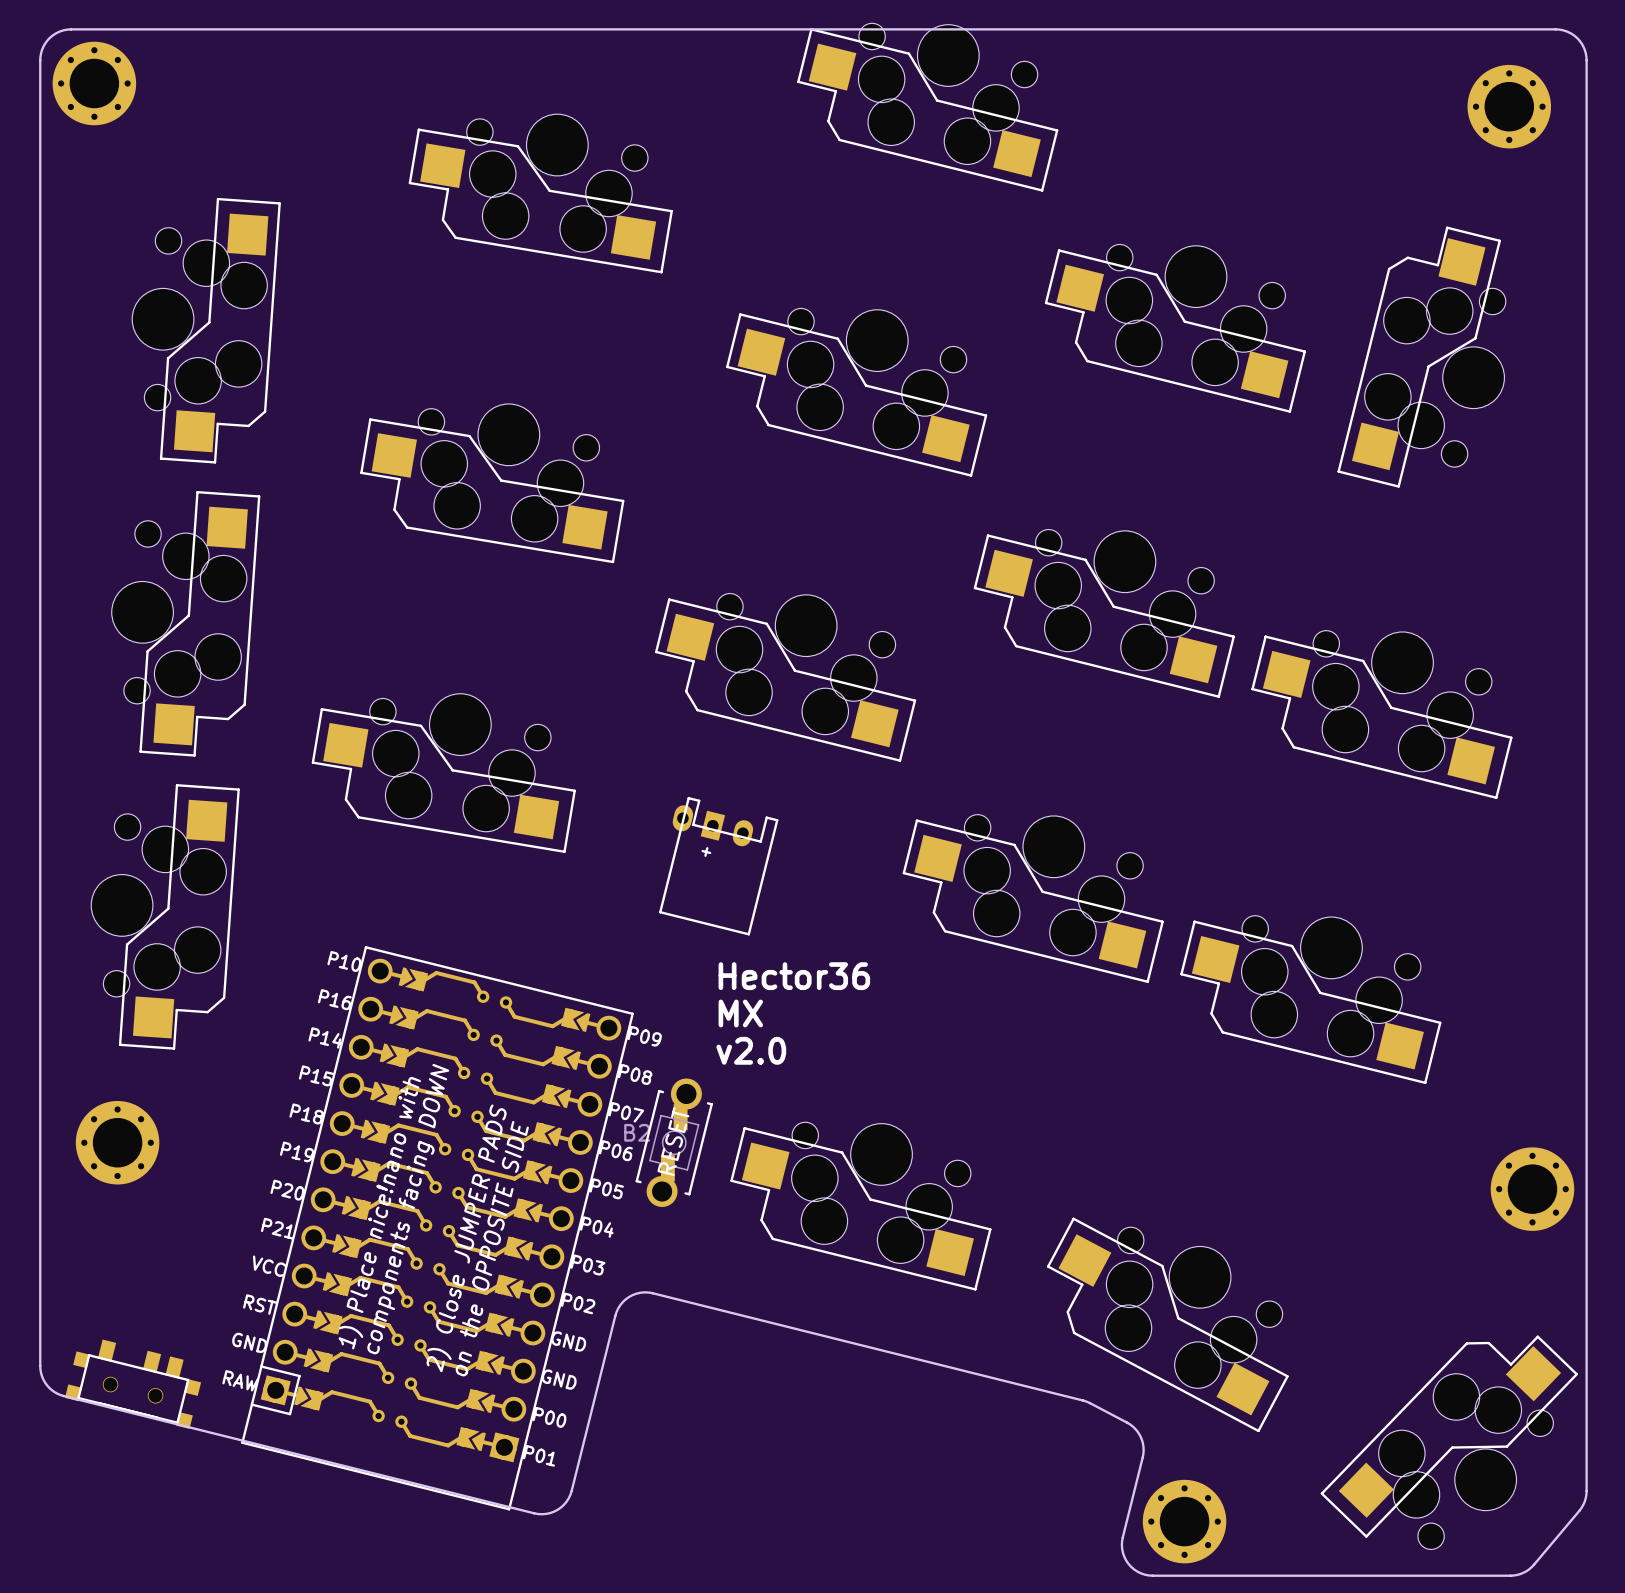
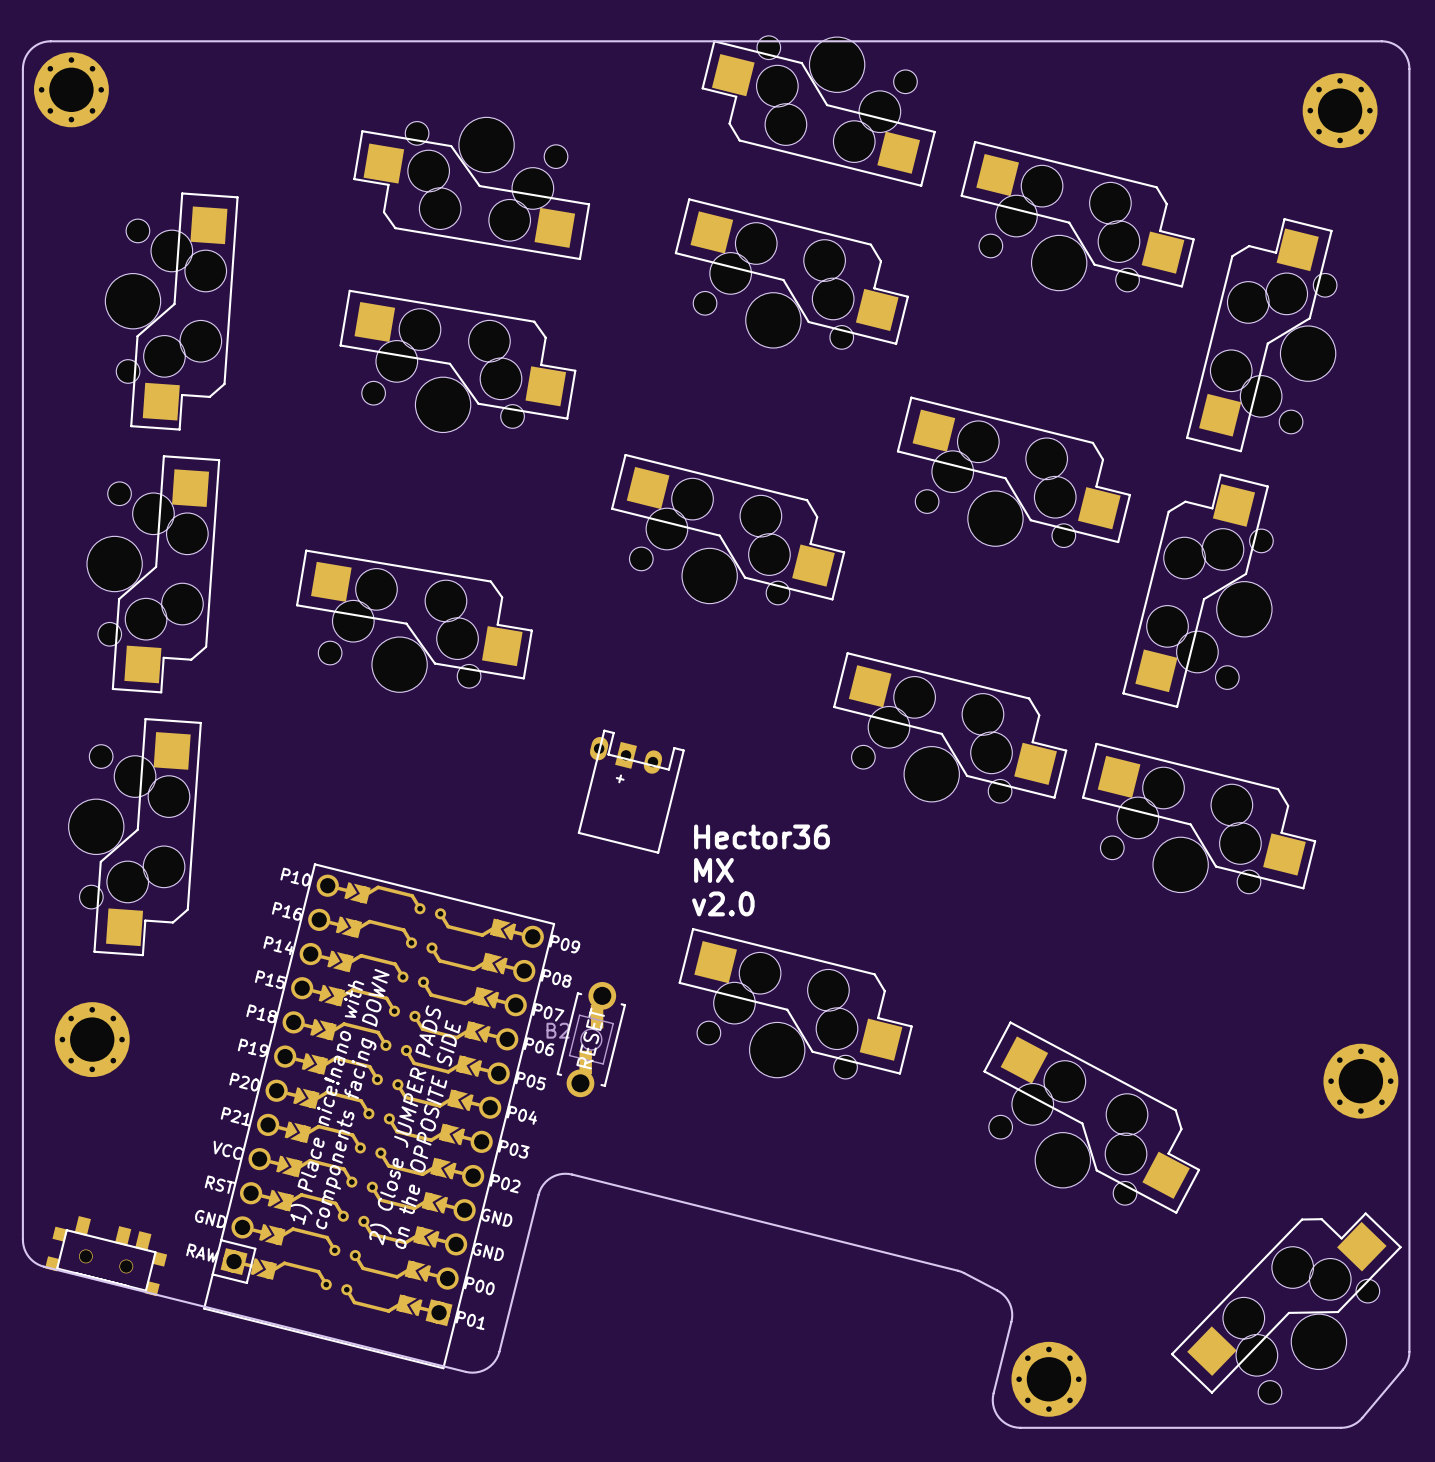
line: none -> (975, 142) (961, 195) (1069, 222) (1094, 264) (1181, 286) (1193, 239) (1160, 231) (1166, 204) (1156, 187) (975, 142)
line: none -> (689, 199) (675, 253) (783, 280) (808, 322) (896, 343) (907, 296) (874, 288) (880, 261) (870, 244) (689, 199)
part: none -> (1080, 222)
line: (1059, 250) (1046, 302) (1083, 312) (1076, 342) (1087, 361) (1289, 411) (1304, 351) (1184, 321) (1156, 274) (1059, 250) -> none
part: none -> (794, 280)
line: none -> (349, 290) (340, 345) (449, 363) (478, 403) (567, 418) (575, 370) (541, 365) (545, 337) (534, 321) (349, 290)
line: (740, 314) (837, 338) (866, 385) (986, 415) (971, 475) (768, 425) (757, 406) (764, 376) (727, 366) (740, 314) -> none
part: (1172, 321) -> none
part: (853, 385) -> none
line: (370, 419) (361, 472) (399, 479) (394, 509) (407, 527) (613, 561) (623, 500) (501, 480) (469, 436) (370, 419) -> none
line: none -> (911, 397) (897, 451) (1005, 478) (1030, 520) (1118, 542) (1129, 495) (1096, 486) (1103, 459) (1092, 442) (911, 397)
part rotation: 0° (489, 476) -> 180° (460, 367)
line: none -> (625, 454) (612, 508) (719, 535) (744, 577) (832, 599) (844, 552) (810, 543) (817, 517) (807, 500) (625, 454)
line: none -> (1220, 474) (1267, 486) (1246, 573) (1204, 599) (1177, 706) (1123, 693) (1168, 511) (1185, 501) (1212, 508) (1220, 474)
part: none -> (1016, 478)
line: (988, 535) (974, 588) (1012, 597) (1004, 627) (1016, 646) (1218, 696) (1233, 636) (1113, 606) (1085, 559) (988, 535) -> none
part: none -> (730, 535)
line: none -> (306, 550) (297, 605) (406, 623) (434, 663) (523, 678) (531, 630) (497, 624) (502, 597) (490, 581) (306, 550)
line: (669, 599) (656, 652) (693, 661) (686, 691) (697, 710) (900, 760) (914, 700) (794, 670) (766, 623) (669, 599) -> none
part: (1101, 606) -> none
line: (1265, 636) (1252, 689) (1290, 698) (1282, 728) (1293, 747) (1496, 797) (1511, 737) (1391, 707) (1363, 660) (1265, 636) -> none
part: (782, 670) -> none
part rotation: 0° (1378, 707) -> 90° clockwise (1204, 588)
line: (321, 709) (312, 762) (351, 769) (345, 799) (358, 817) (564, 851) (574, 790) (452, 770) (420, 725) (321, 709) -> none
line: none -> (847, 653) (834, 707) (941, 733) (967, 775) (1054, 797) (1066, 750) (1032, 742) (1039, 715) (1029, 698) (847, 653)
part rotation: 0° (441, 766) -> 180° (416, 627)
part: none -> (952, 734)
line: none -> (1096, 743) (1083, 797) (1190, 824) (1215, 866) (1303, 888) (1315, 841) (1281, 832) (1288, 805) (1278, 789) (1096, 743)
line: (916, 820) (903, 873) (941, 882) (933, 912) (945, 931) (1147, 981) (1162, 921) (1042, 891) (1014, 844) (916, 820) -> none
part: (1030, 891) -> none
part: none -> (1201, 824)
line: (1194, 921) (1181, 974) (1218, 983) (1211, 1013) (1222, 1032) (1425, 1082) (1440, 1022) (1320, 992) (1292, 946) (1194, 921) -> none
text position: Hector36 (794, 976) -> Hector36 (762, 836)
part: (1307, 992) -> none
text position: MX (740, 1013) -> MX (713, 870)
line: none -> (693, 929) (874, 974) (884, 991) (878, 1018) (911, 1026) (899, 1073) (812, 1051) (787, 1009) (679, 982) (693, 929)
text position: v2.0 (751, 1050) -> v2.0 (723, 903)
line: none -> (1010, 1022) (1175, 1110) (1181, 1129) (1168, 1153) (1199, 1169) (1176, 1212) (1096, 1170) (1082, 1123) (984, 1071) (1010, 1022)
line: (744, 1128) (731, 1180) (769, 1190) (761, 1220) (772, 1238) (975, 1289) (990, 1229) (870, 1199) (842, 1152) (744, 1128) -> none
part rotation: 0° (857, 1199) -> 180° (798, 1009)
line: (1073, 1218) (1048, 1266) (1082, 1284) (1067, 1312) (1074, 1332) (1258, 1430) (1287, 1376) (1178, 1318) (1162, 1265) (1073, 1218) -> none
part rotation: 0° (1170, 1321) -> 180° (1089, 1120)

